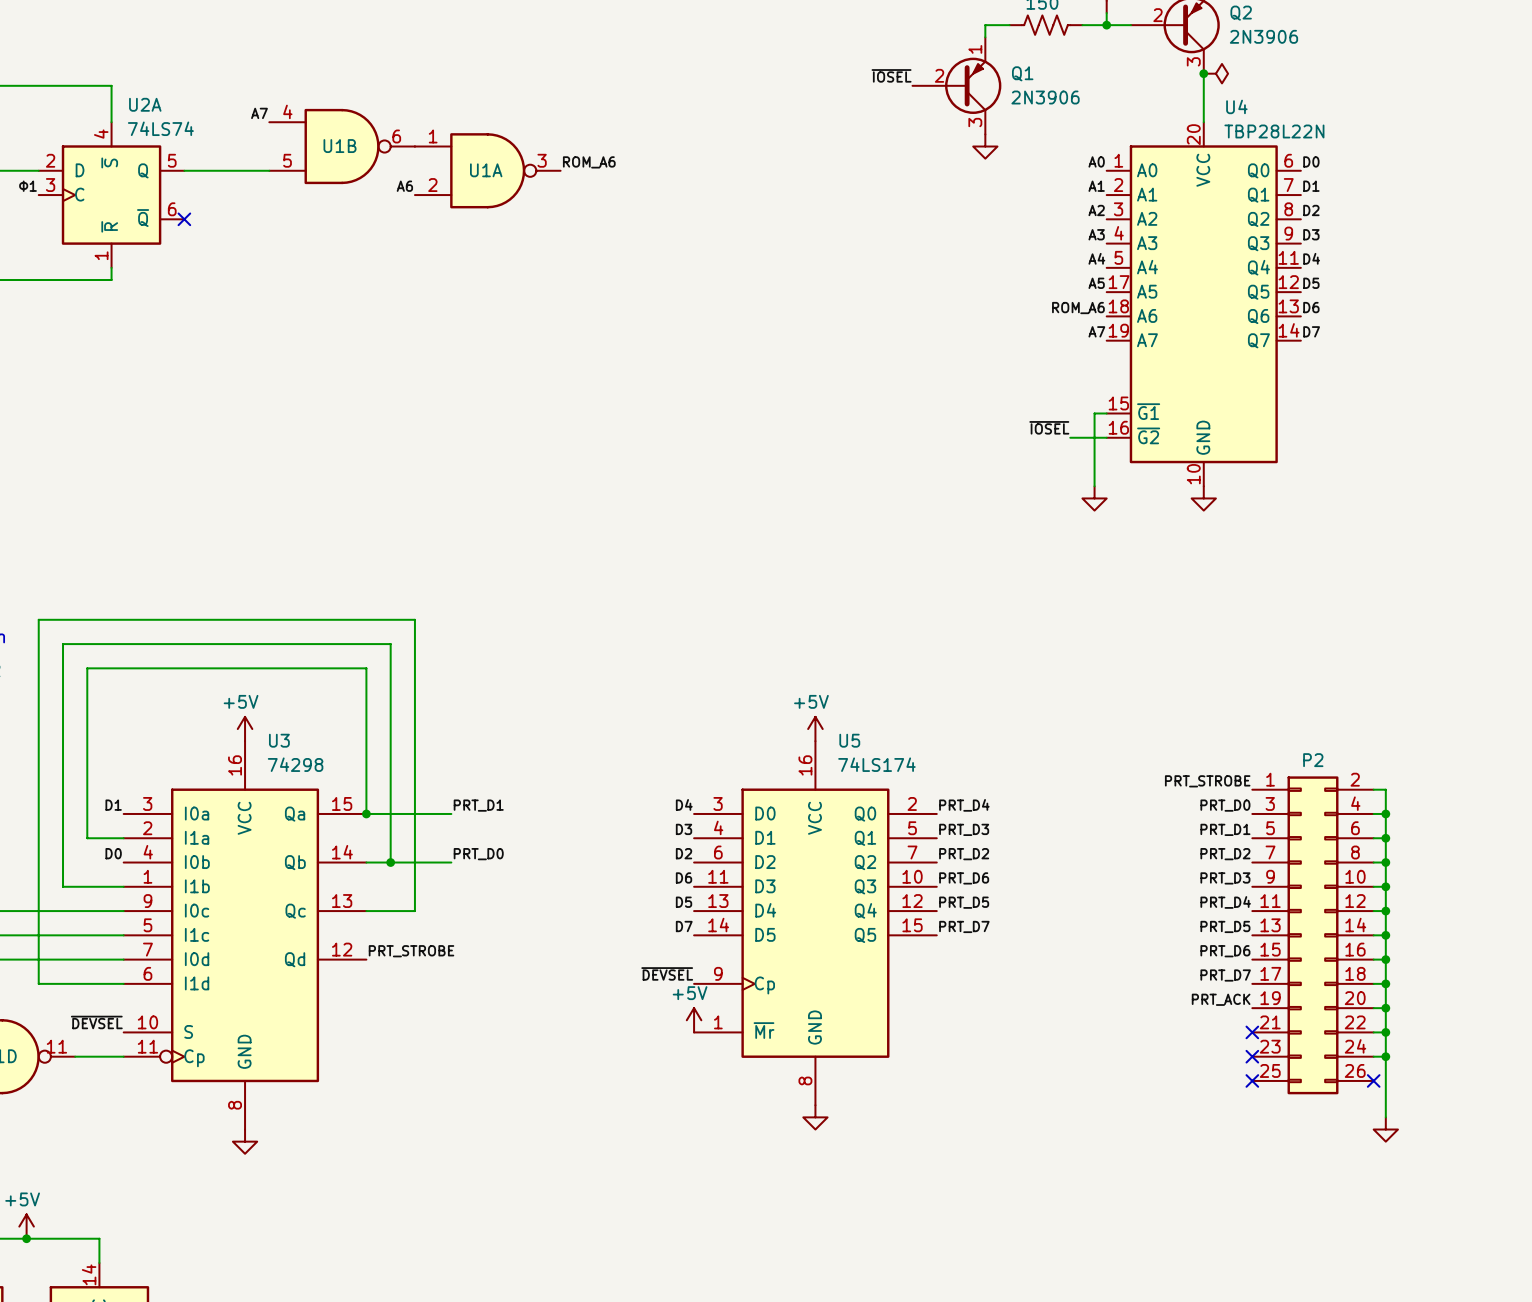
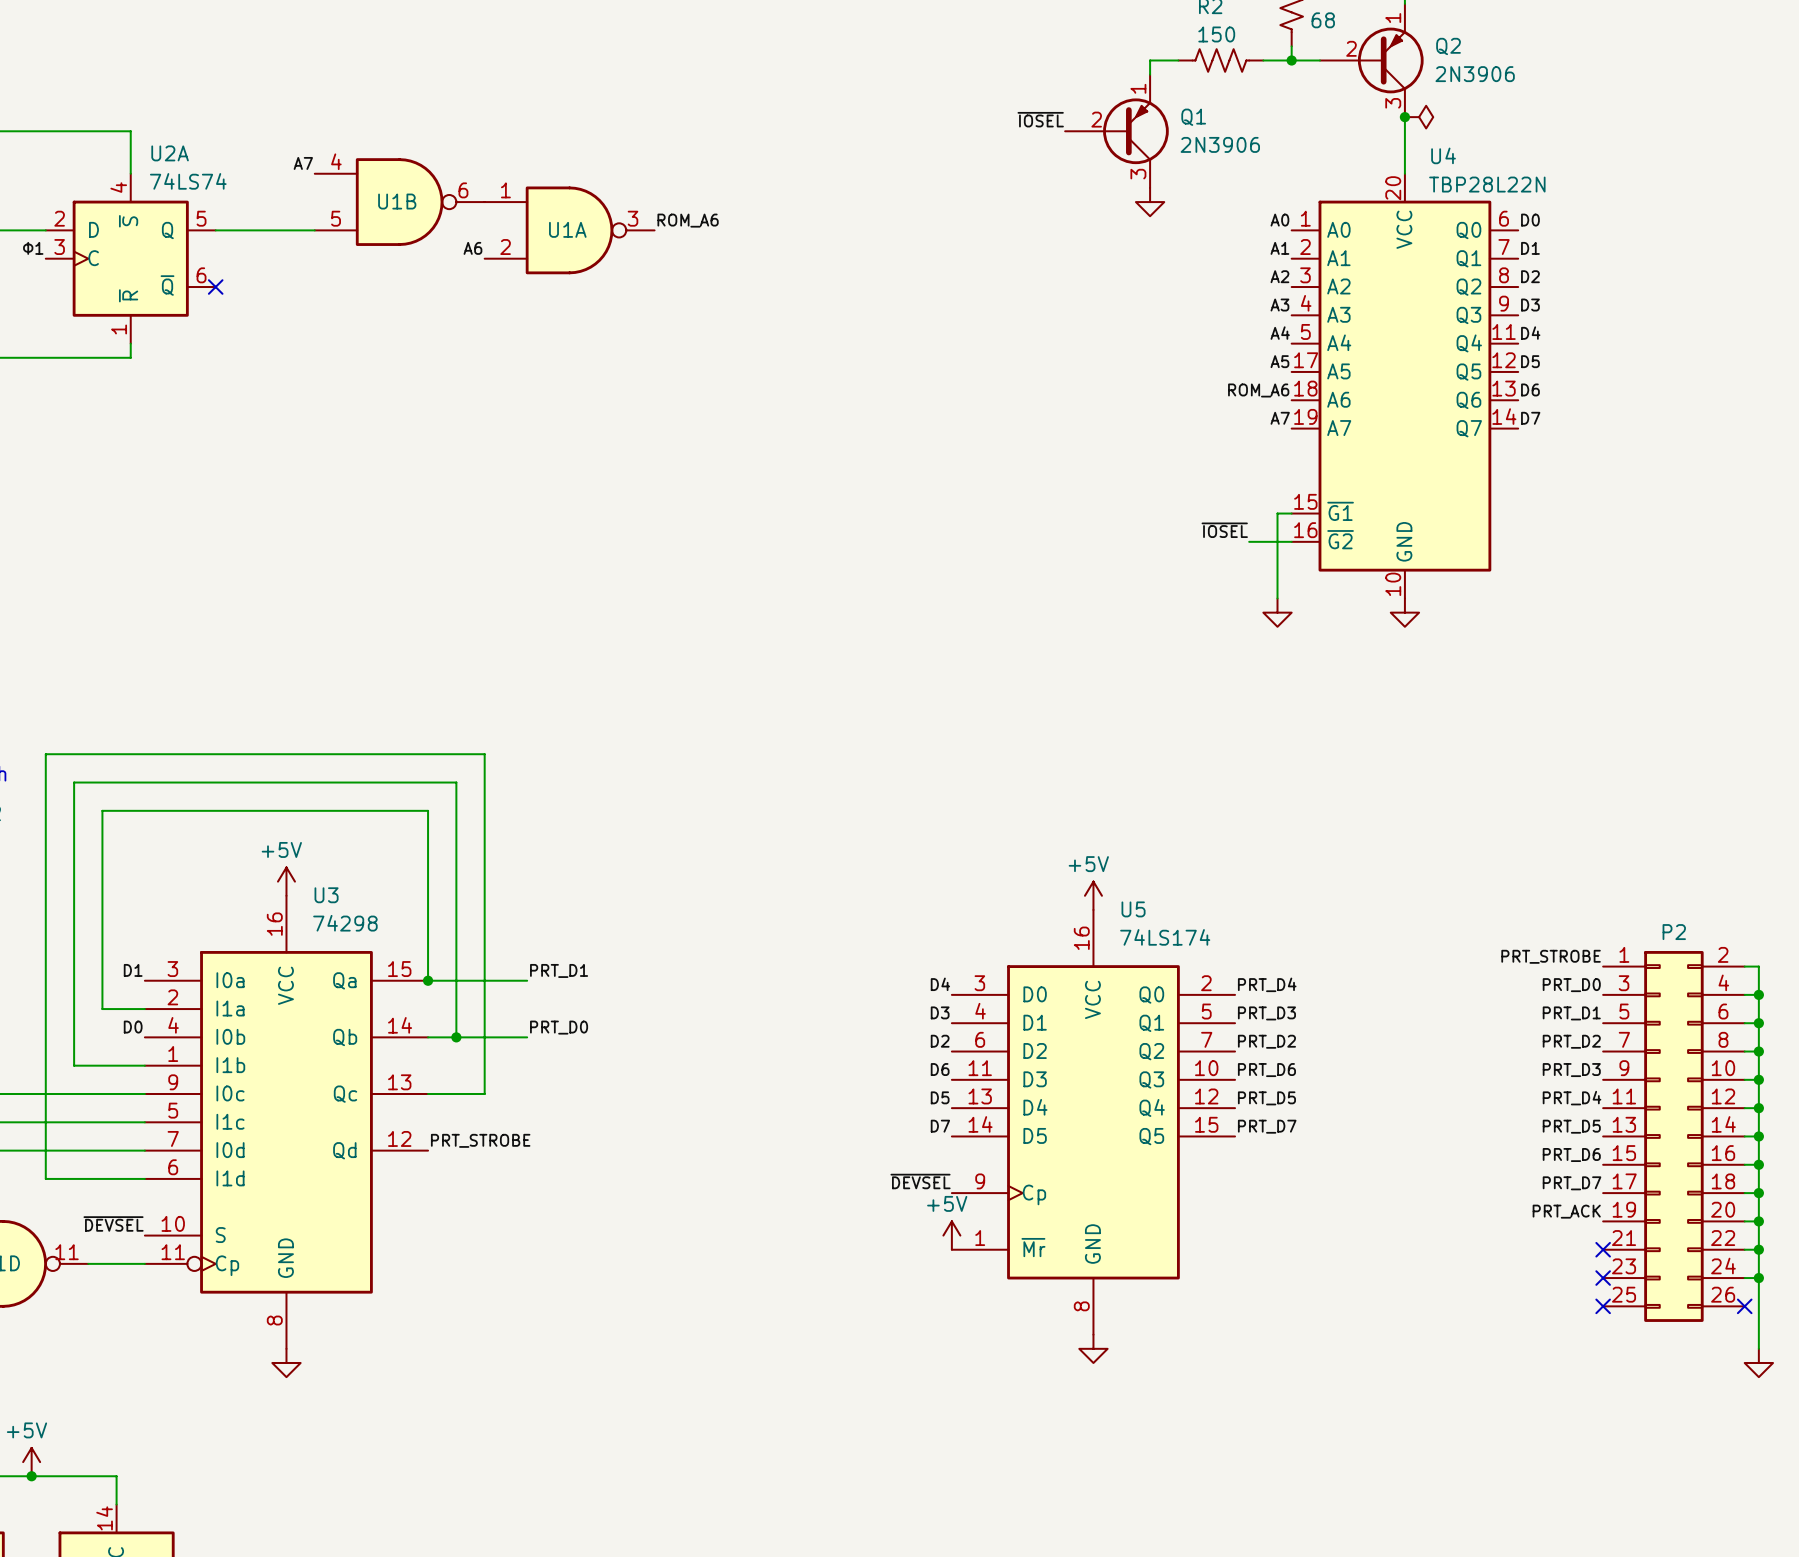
power symbol position: +5V (815, 729) -> +5V (1093, 895)
label position: PRT_STROBE (1207, 781) -> PRT_STROBE (1551, 956)
wire: (1373, 789) (1385, 789) (1385, 1117) -> (1744, 966) (1758, 966) (1758, 1348)
label position: D4 (684, 804) -> D4 (940, 984)
label: PRT_D4 (964, 805) -> none
label position: PRT_D0 (1225, 805) -> PRT_D0 (1571, 985)
wire: (1373, 813) (1385, 813) -> (1744, 994) (1758, 994)
junction: (1385, 813) -> none
label: none -> PRT_D4 (1267, 984)
junction: none -> (1758, 994)
label position: D3 (684, 829) -> D3 (940, 1012)
label: PRT_D3 (964, 829) -> none
label position: PRT_D1 (1225, 829) -> PRT_D1 (1571, 1013)
wire: (1373, 838) (1385, 838) -> (1744, 1023) (1758, 1023)
junction: (1385, 838) -> none
label: none -> PRT_D3 (1266, 1013)
junction: none -> (1758, 1023)
label position: D2 (684, 853) -> D2 (940, 1041)
label: PRT_D2 (964, 854) -> none
label: PRT_D2 (1225, 854) -> none
wire: (1373, 862) (1385, 862) -> (1744, 1051) (1758, 1051)
junction: (1385, 862) -> none
label: none -> PRT_D2 (1266, 1041)
label: none -> PRT_D2 (1571, 1041)
junction: none -> (1758, 1051)
label position: D6 (684, 877) -> D6 (940, 1069)
label: PRT_D6 (964, 878) -> none
label: PRT_D3 (1225, 878) -> none
wire: (1373, 886) (1385, 886) -> (1744, 1079) (1758, 1079)
junction: (1385, 886) -> none
label: none -> PRT_D6 (1266, 1070)
label: none -> PRT_D3 (1571, 1070)
junction: none -> (1758, 1079)
label position: D5 (684, 902) -> D5 (940, 1097)
label: PRT_D5 (964, 902) -> none
label: PRT_D4 (1225, 902) -> none
wire: (1373, 911) (1385, 911) -> (1744, 1108) (1758, 1108)
junction: (1385, 911) -> none
label: none -> PRT_D5 (1266, 1098)
label: none -> PRT_D4 (1572, 1098)
U5 position: (815, 923) -> (1093, 1122)
junction: none -> (1758, 1108)
label position: D7 (684, 926) -> D7 (940, 1126)
label: PRT_D7 (964, 926) -> none
label: PRT_D5 (1225, 926) -> none
P2 position: (1313, 935) -> (1673, 1136)
wire: (1373, 935) (1385, 935) -> (1744, 1136) (1758, 1136)
junction: (1385, 935) -> none
label: none -> PRT_D7 (1267, 1126)
label: none -> PRT_D5 (1571, 1126)
junction: none -> (1758, 1136)
label: PRT_D6 (1225, 951) -> none
wire: (1373, 959) (1385, 959) -> (1744, 1164) (1758, 1164)
junction: (1385, 959) -> none
label: none -> PRT_D6 (1571, 1155)
junction: none -> (1758, 1164)
label position: ~{DEVSEL} (667, 973) -> ~{DEVSEL} (920, 1181)
label: PRT_D7 (1225, 975) -> none
wire: (1373, 983) (1385, 983) -> (1744, 1193) (1758, 1193)
junction: (1385, 983) -> none
label: none -> PRT_D7 (1572, 1183)
junction: none -> (1758, 1193)
label position: PRT_ACK (1221, 999) -> PRT_ACK (1566, 1211)
wire: (1373, 1008) (1385, 1008) -> (1744, 1221) (1758, 1221)
junction: (1385, 1008) -> none
power symbol position: +5V (694, 1020) -> +5V (951, 1235)
junction: none -> (1758, 1221)
no-connect mark: (1252, 1032) -> none
wire: (1373, 1032) (1385, 1032) -> (1744, 1249) (1758, 1249)
junction: (1385, 1032) -> none
no-connect mark: none -> (1603, 1249)
junction: none -> (1758, 1249)
no-connect mark: (1252, 1056) -> none
wire: (1373, 1056) (1385, 1056) -> (1744, 1278) (1758, 1278)
junction: (1385, 1056) -> none
no-connect mark: none -> (1603, 1278)
junction: none -> (1758, 1278)
no-connect mark: (1252, 1080) -> none
no-connect mark: (1373, 1080) -> none
no-connect mark: none -> (1603, 1306)
no-connect mark: none -> (1744, 1306)
power symbol position: (815, 1117) -> (1093, 1348)
power symbol position: (1385, 1129) -> (1758, 1362)

